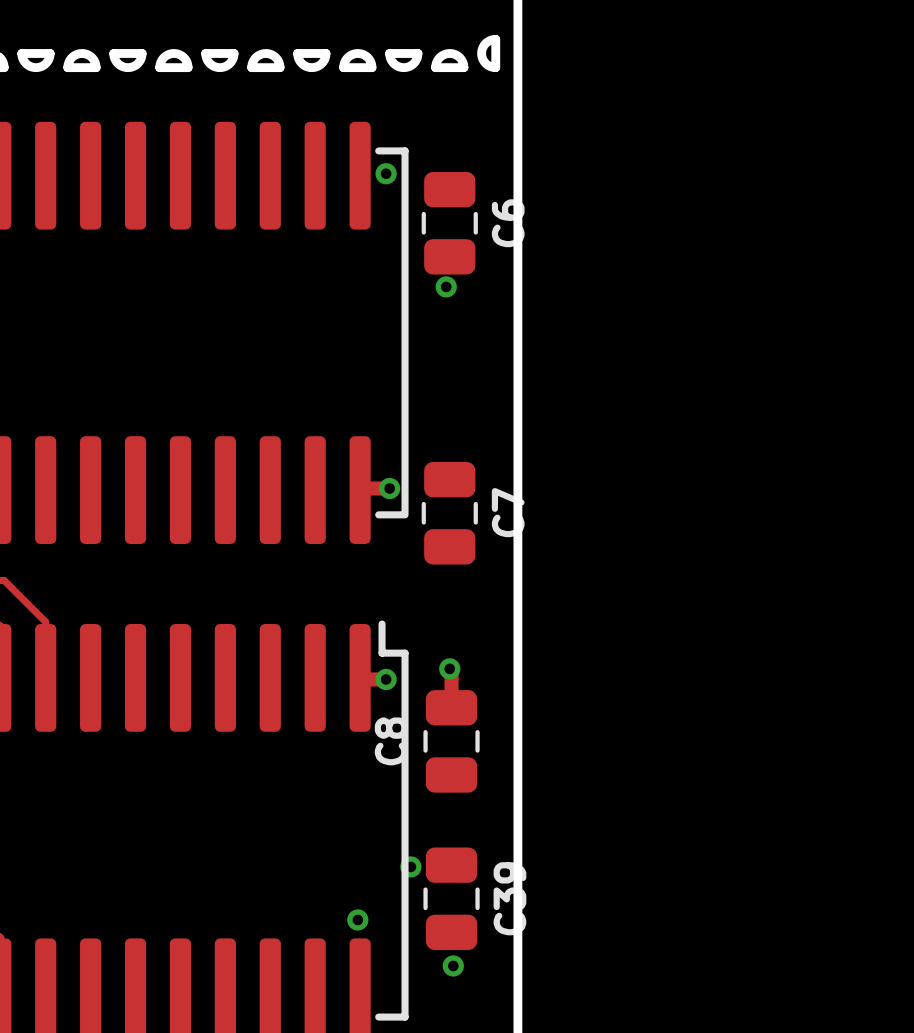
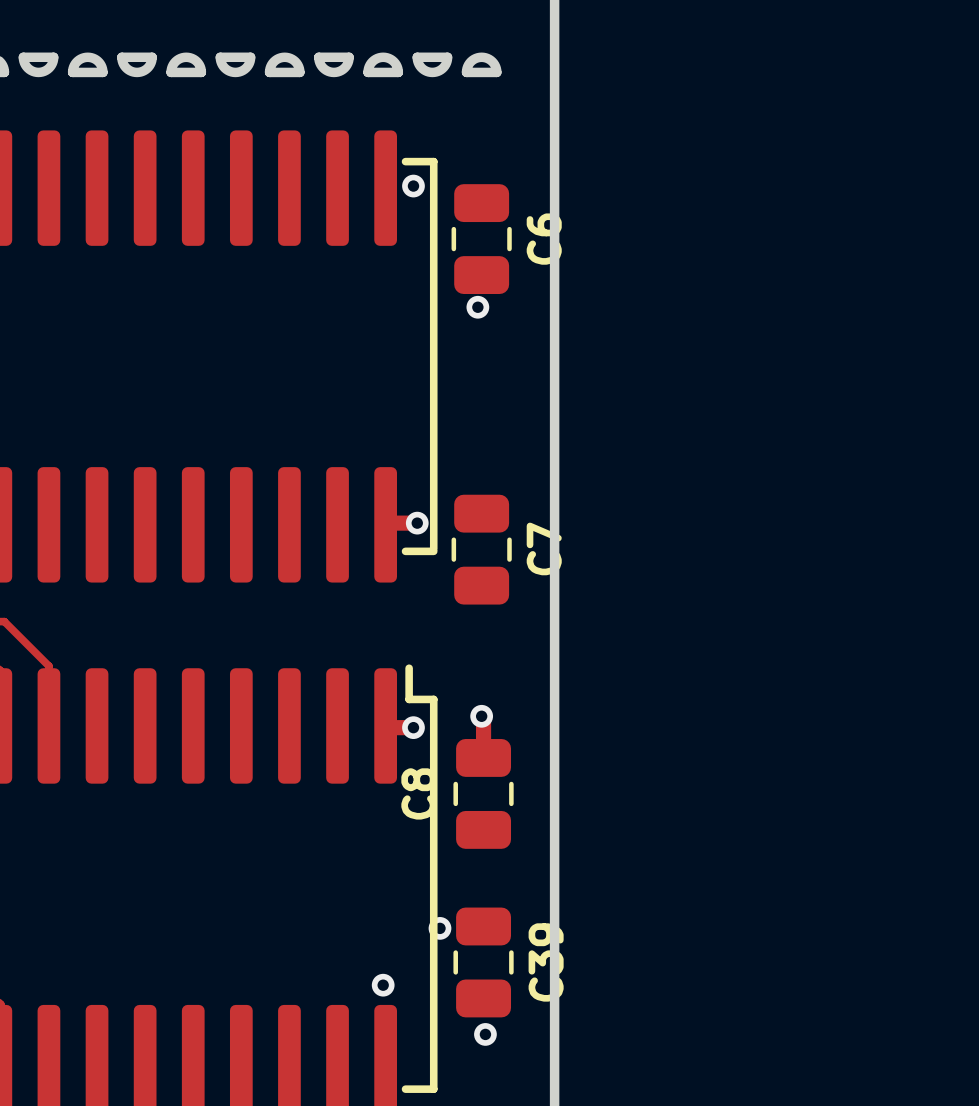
board edge: (495, 39) (495, 67) (485, 62) (481, 53) (486, 42) (495, 39) -> none

